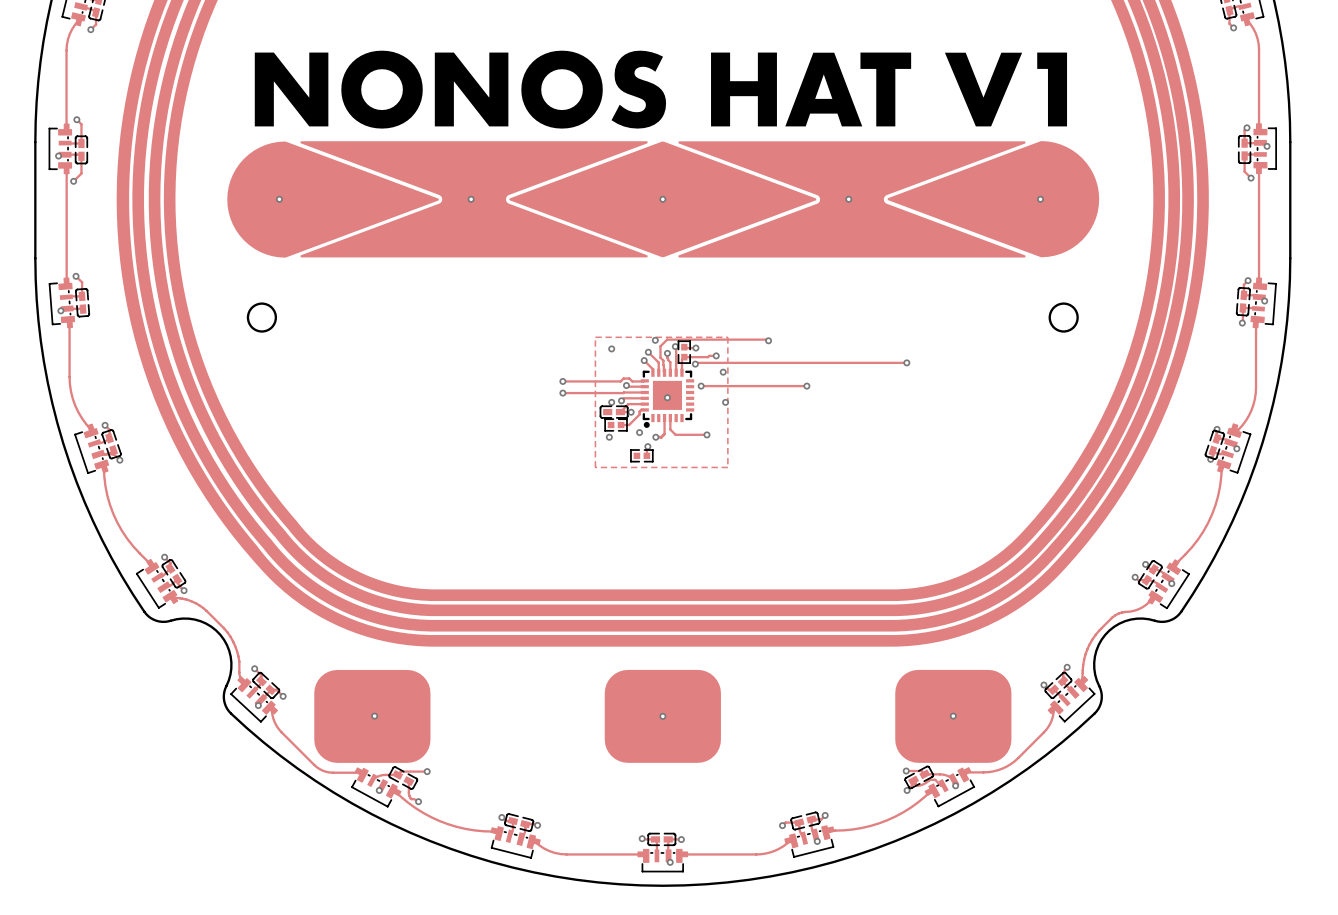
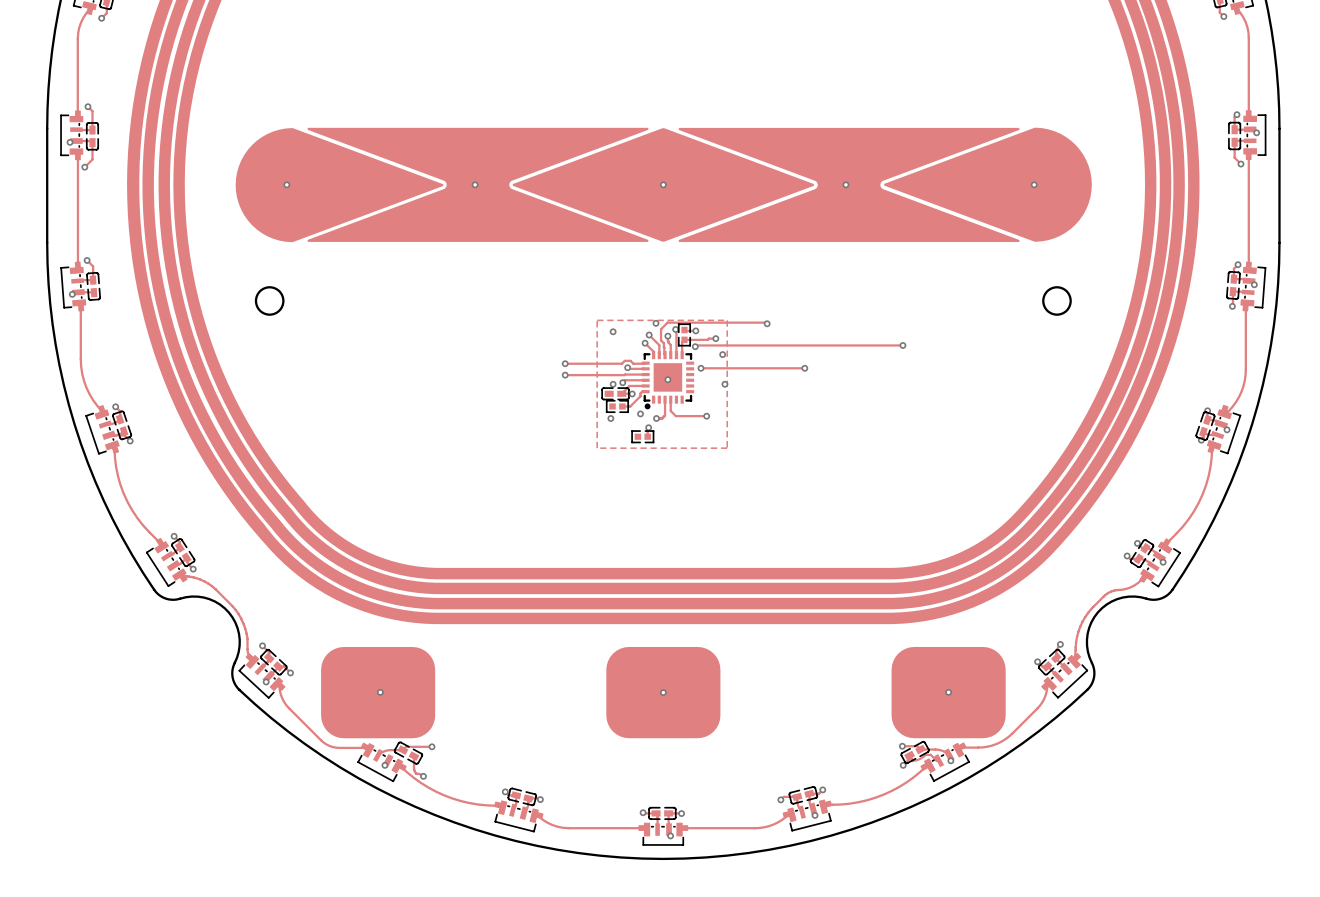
drawing: [254, 50, 667, 129] -> none
drawing: [711, 52, 912, 127] -> none
drawing: [944, 52, 1023, 127] -> none
drawing: [1037, 52, 1068, 127] -> none

